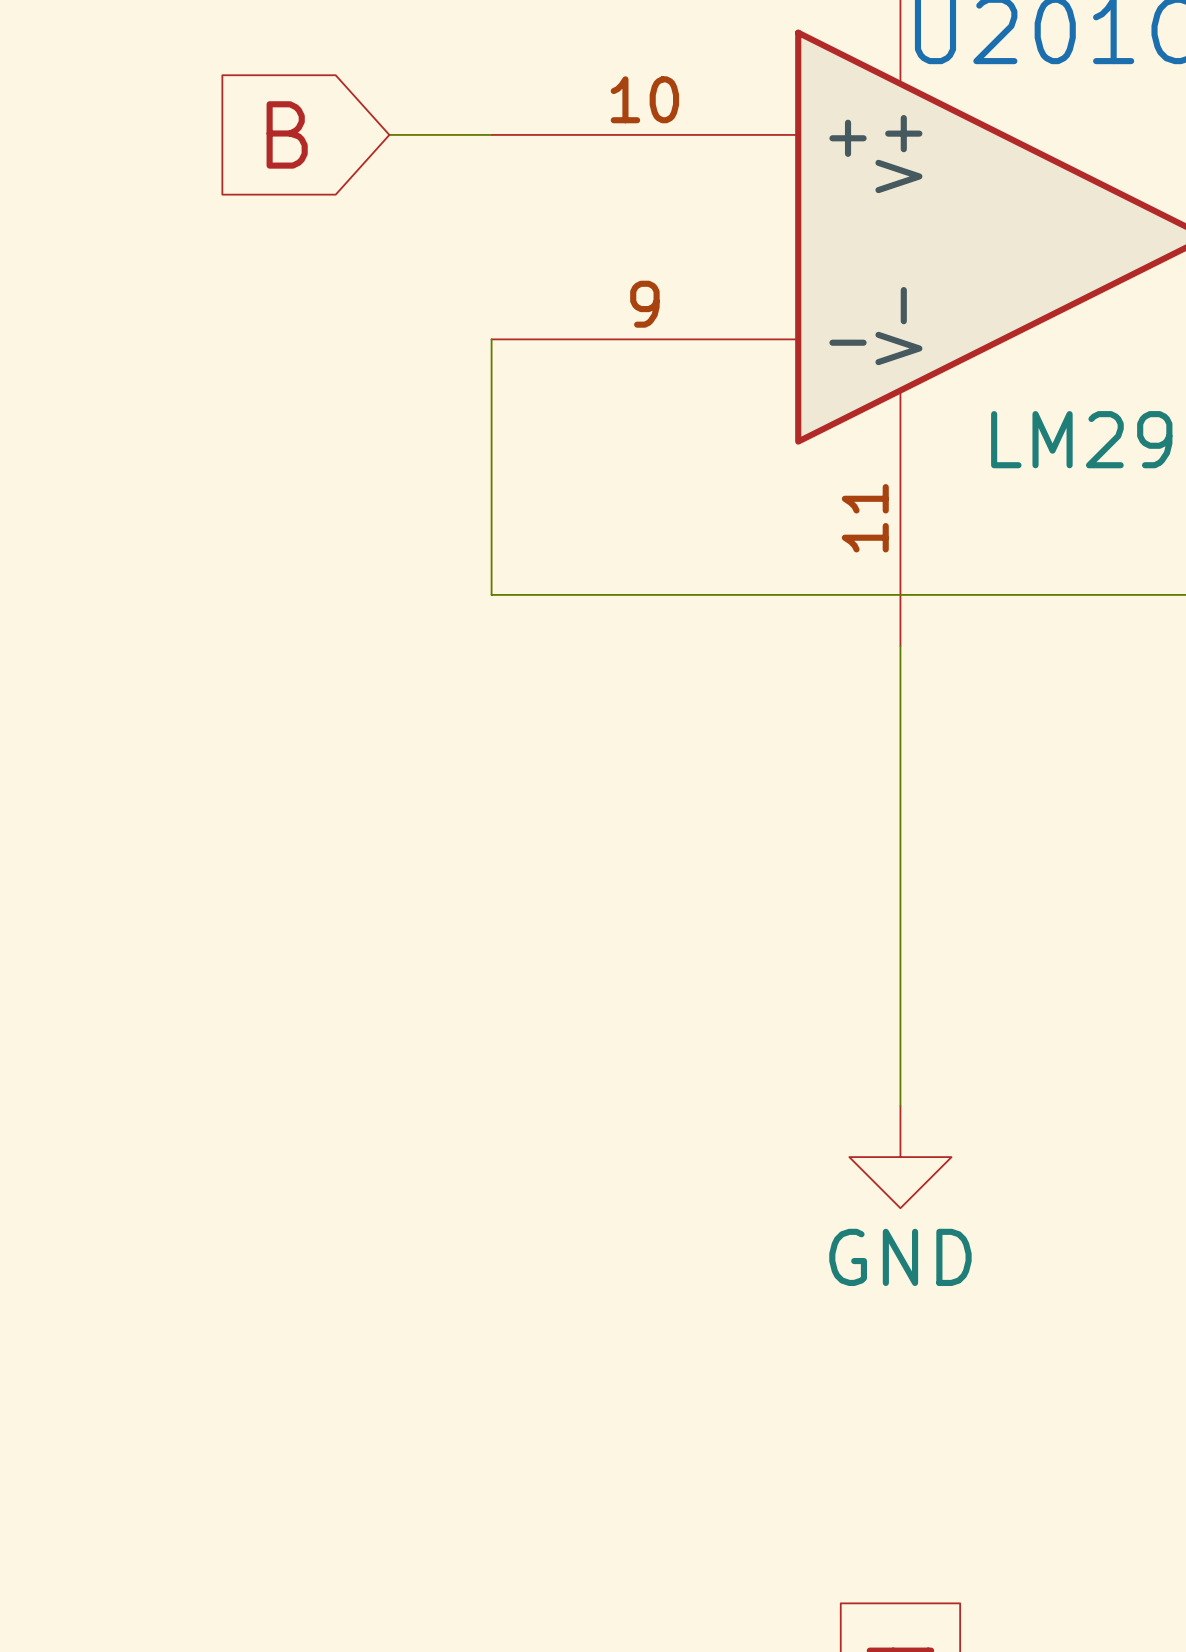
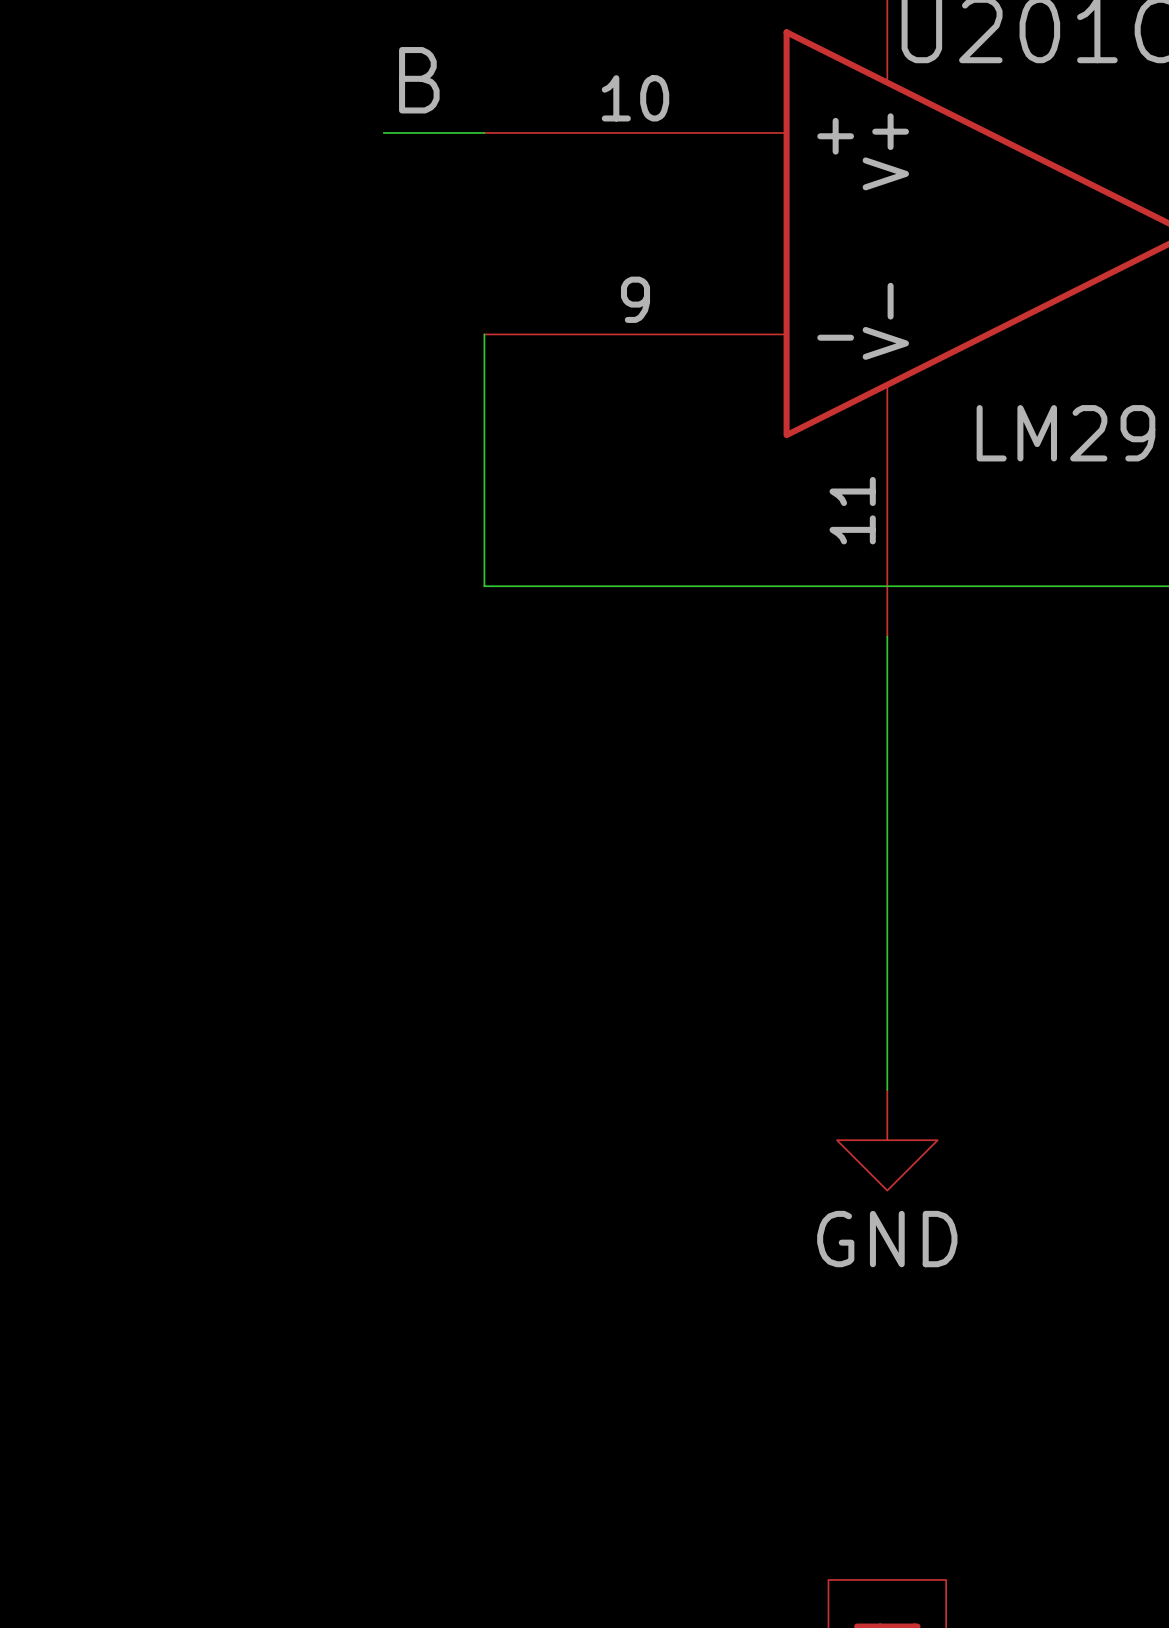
label: none -> B (419, 80)
global label: B (287, 134) -> none

